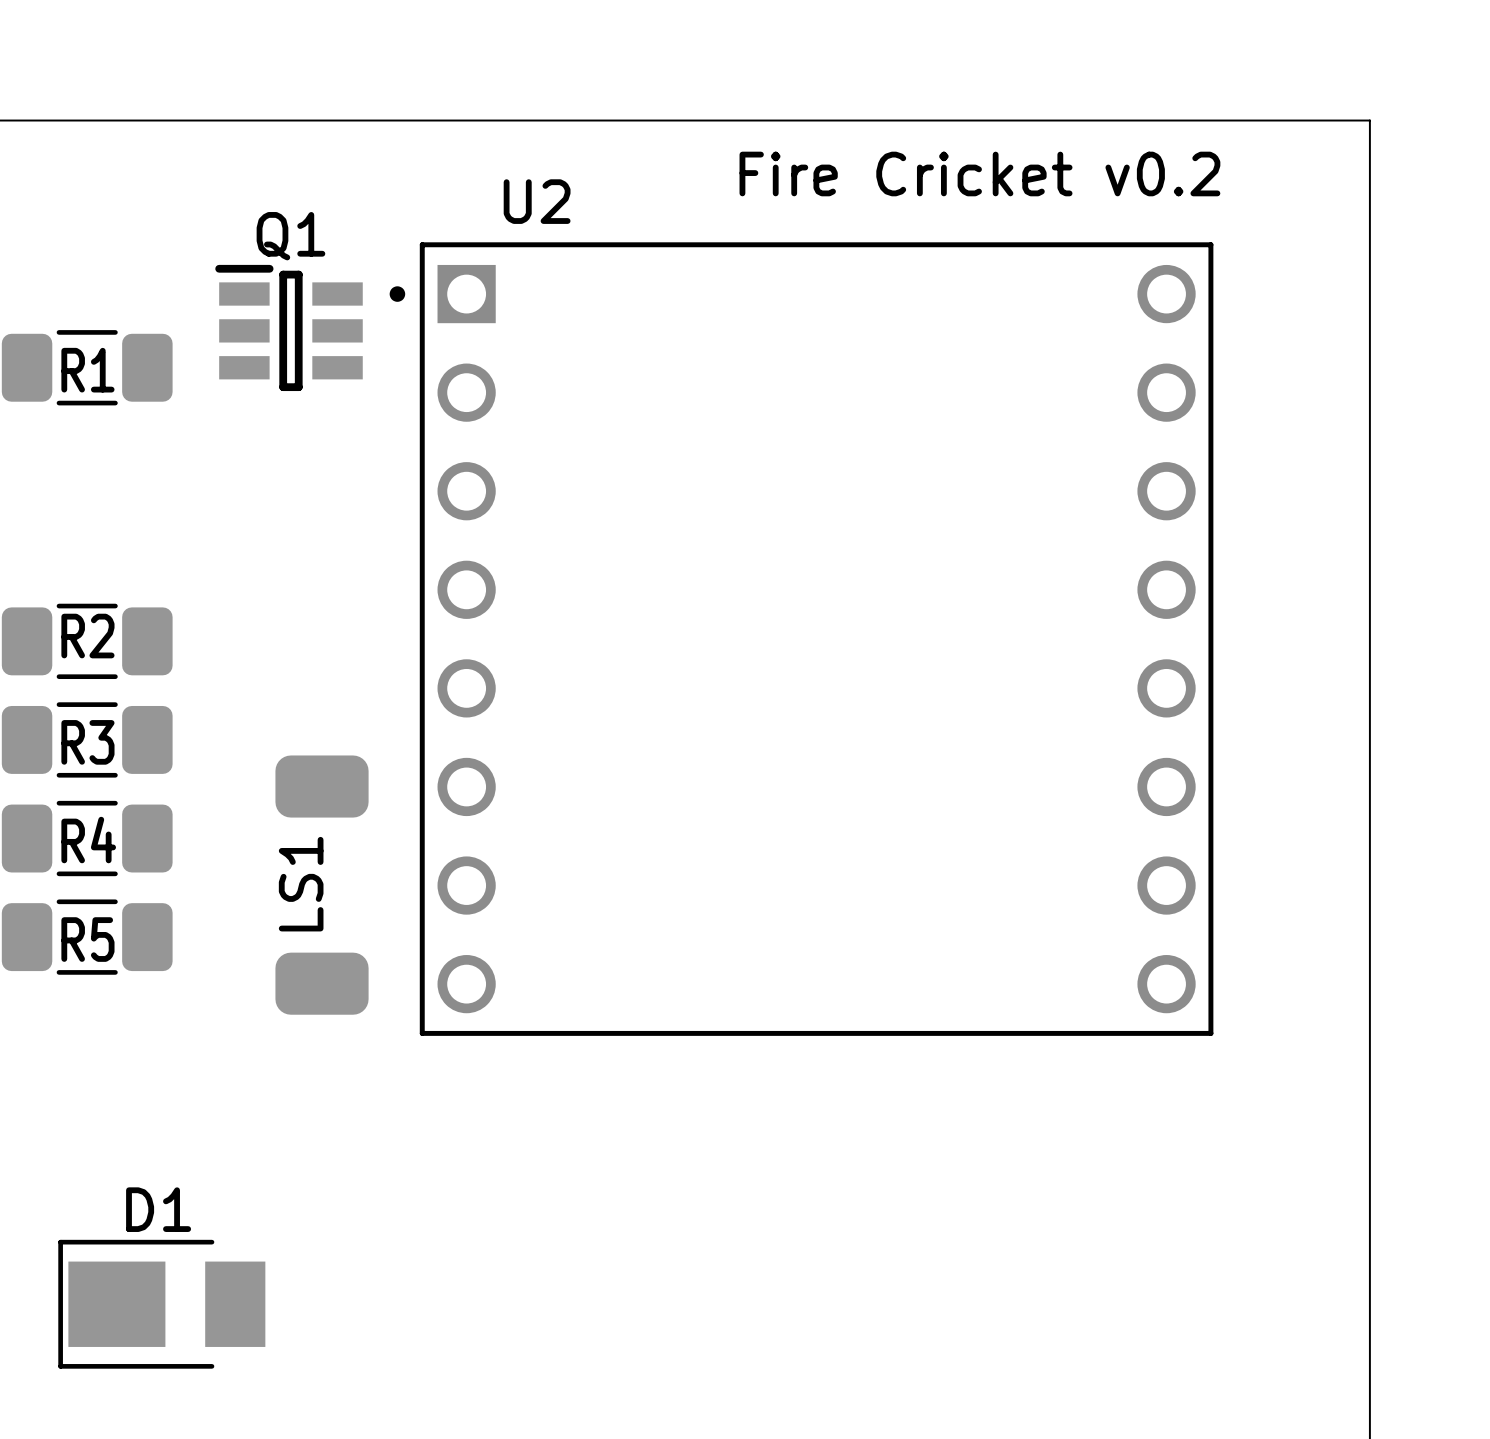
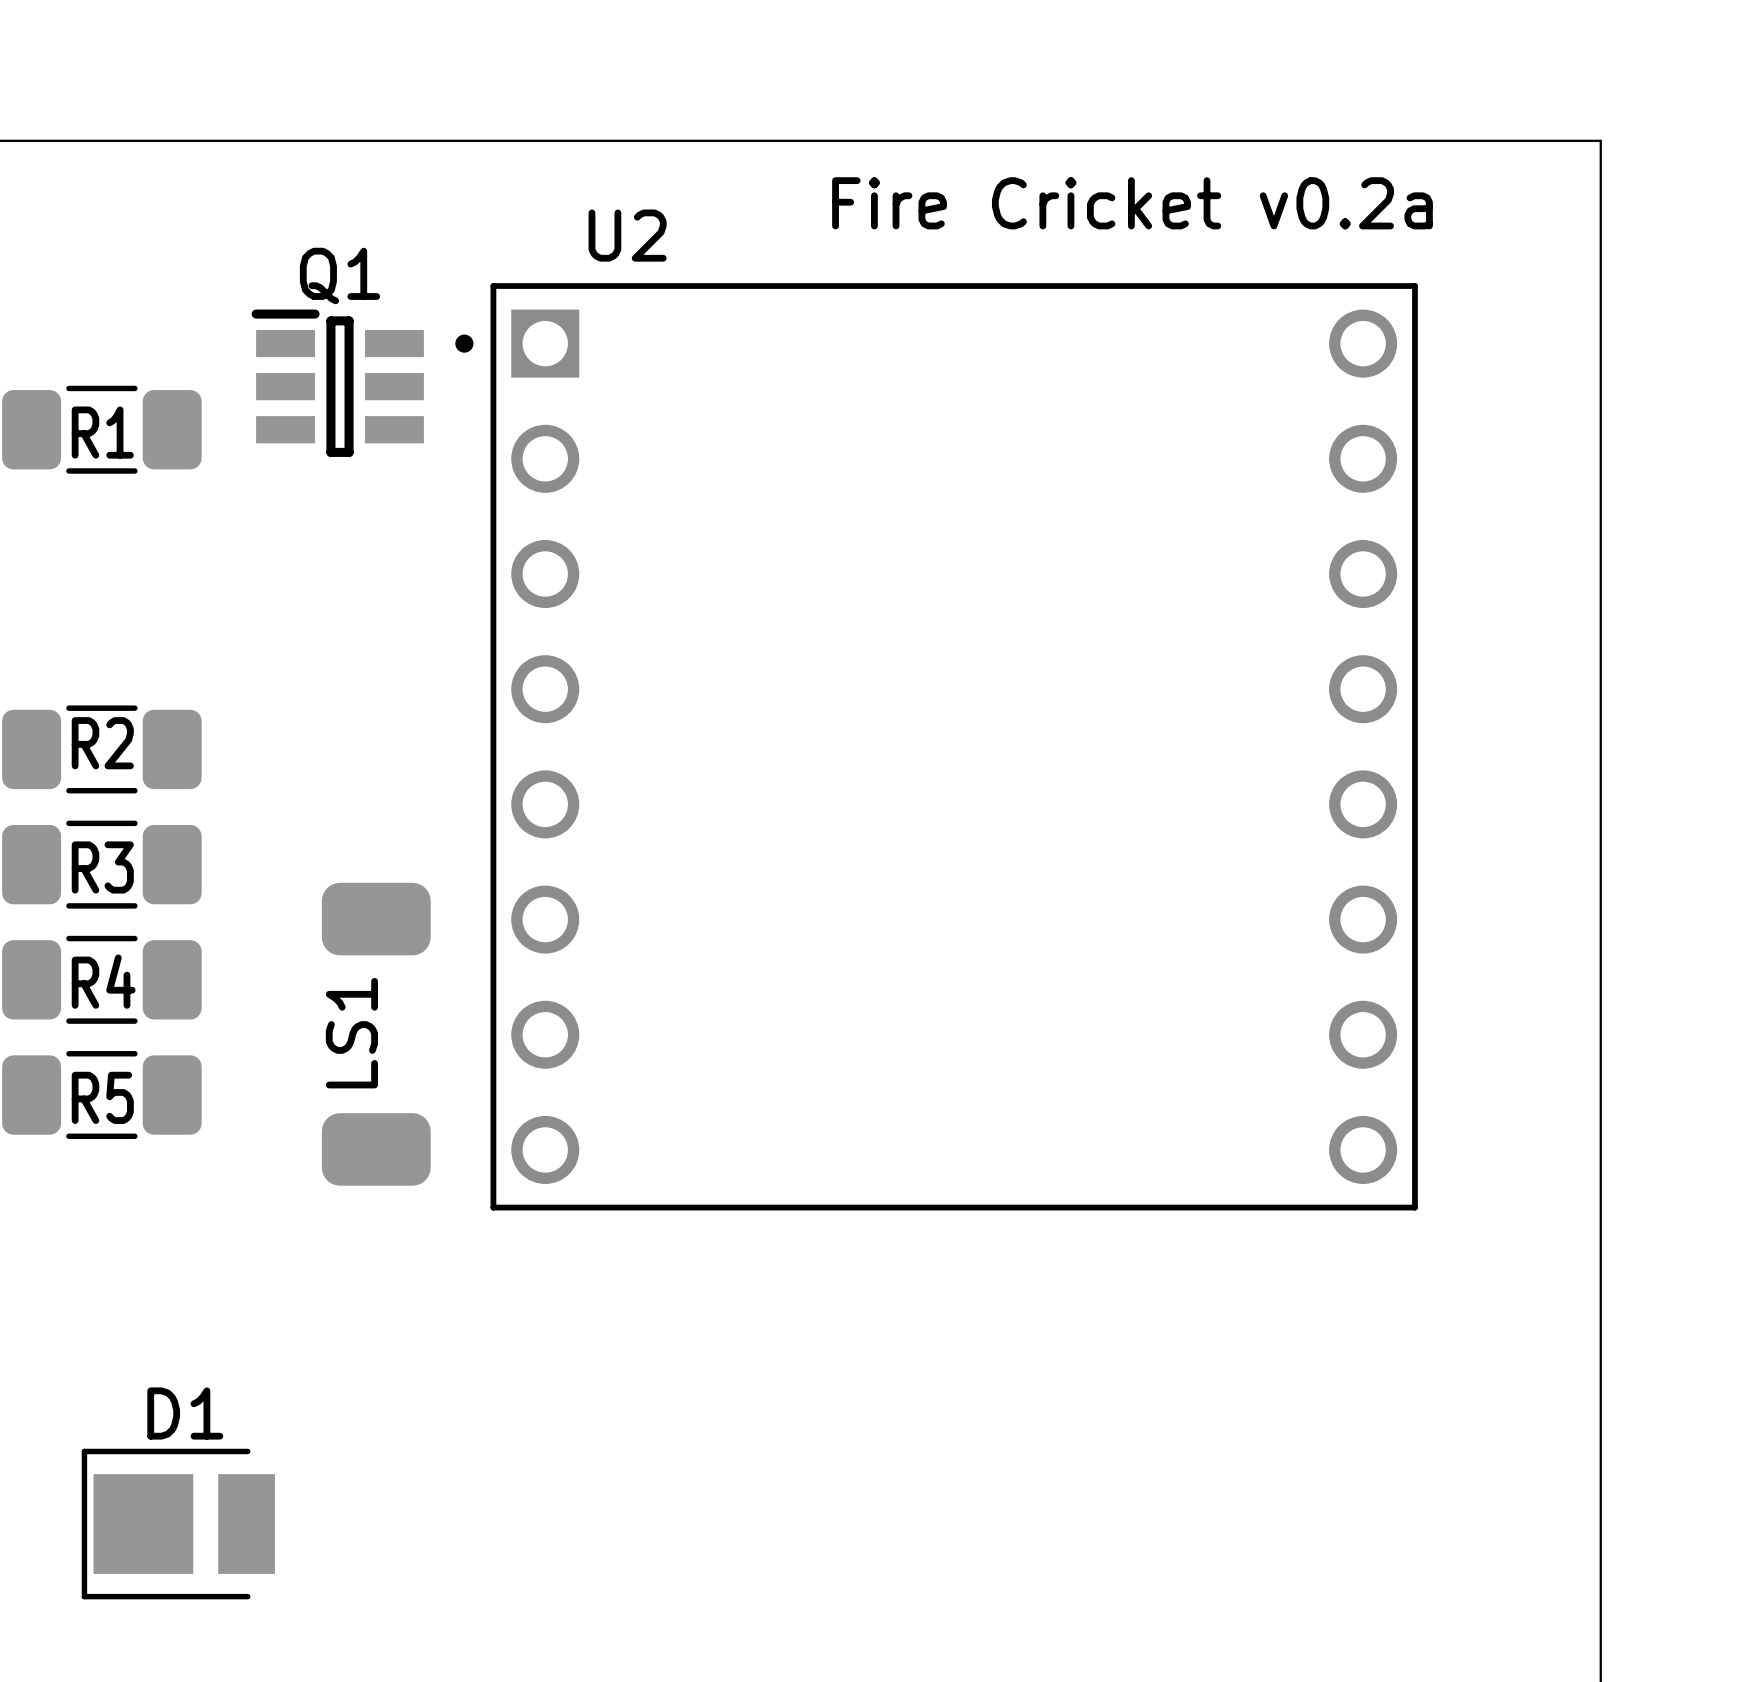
text: Fire Cricket v0.2 (979, 173) -> Fire Cricket v0.2a (1132, 203)
D1 footprint: [58, 1239, 266, 1369] -> [81, 1448, 275, 1600]

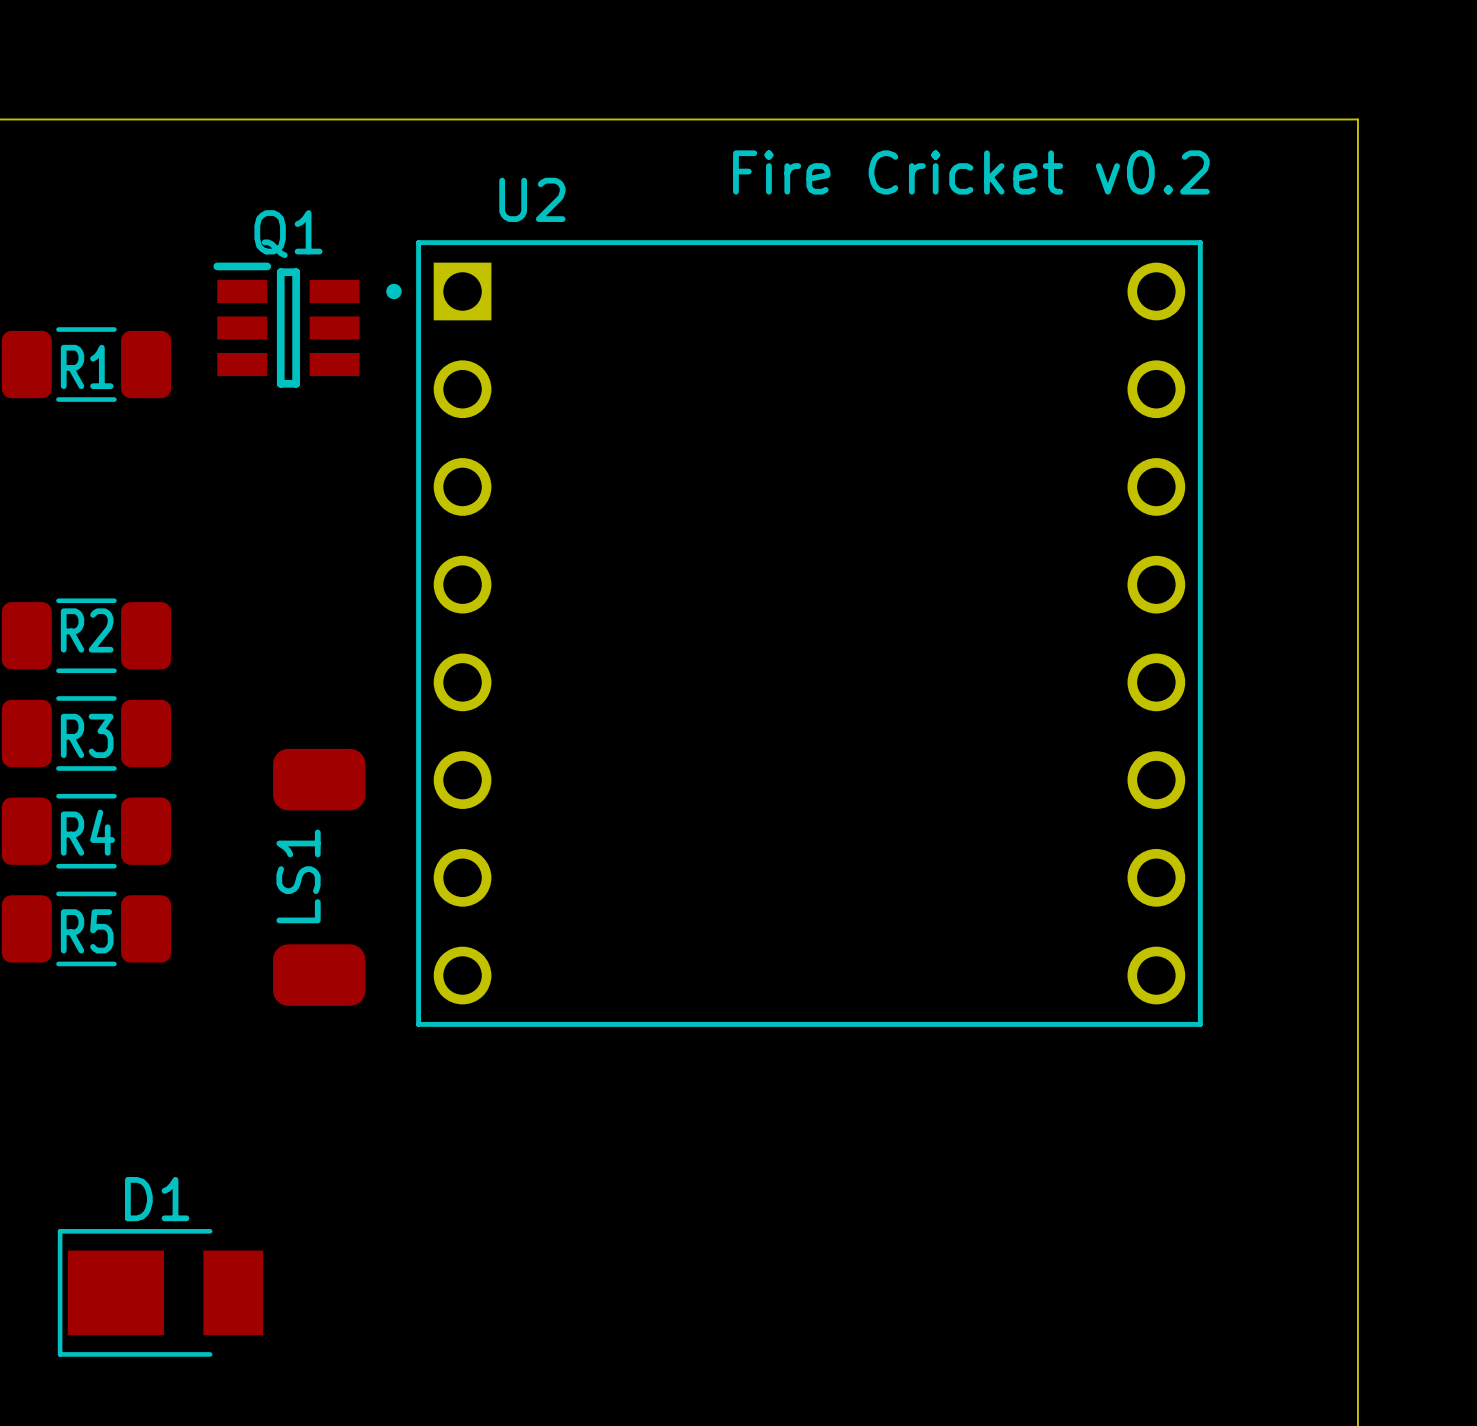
text: Fire Cricket v0.2a (1132, 203) -> Fire Cricket v0.2 (971, 172)
D1 footprint: [81, 1448, 275, 1600] -> [57, 1229, 264, 1357]

